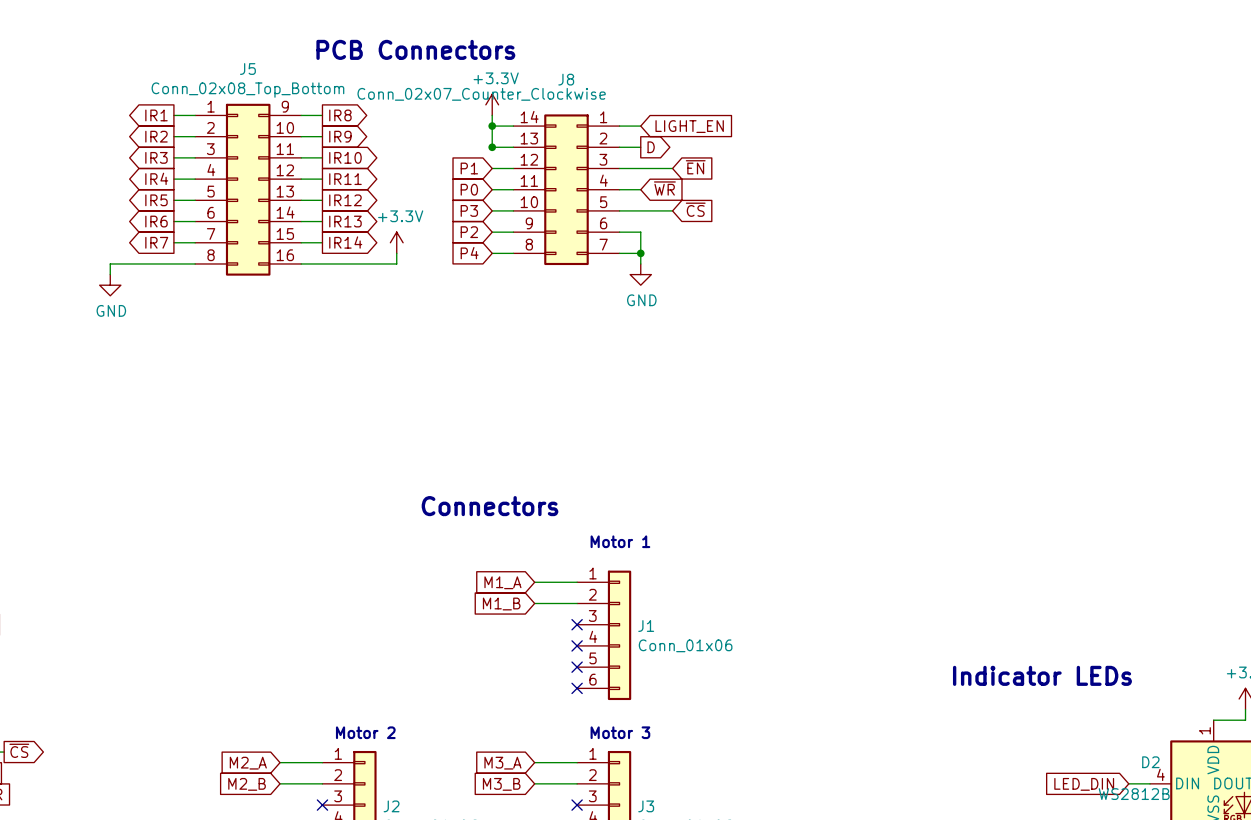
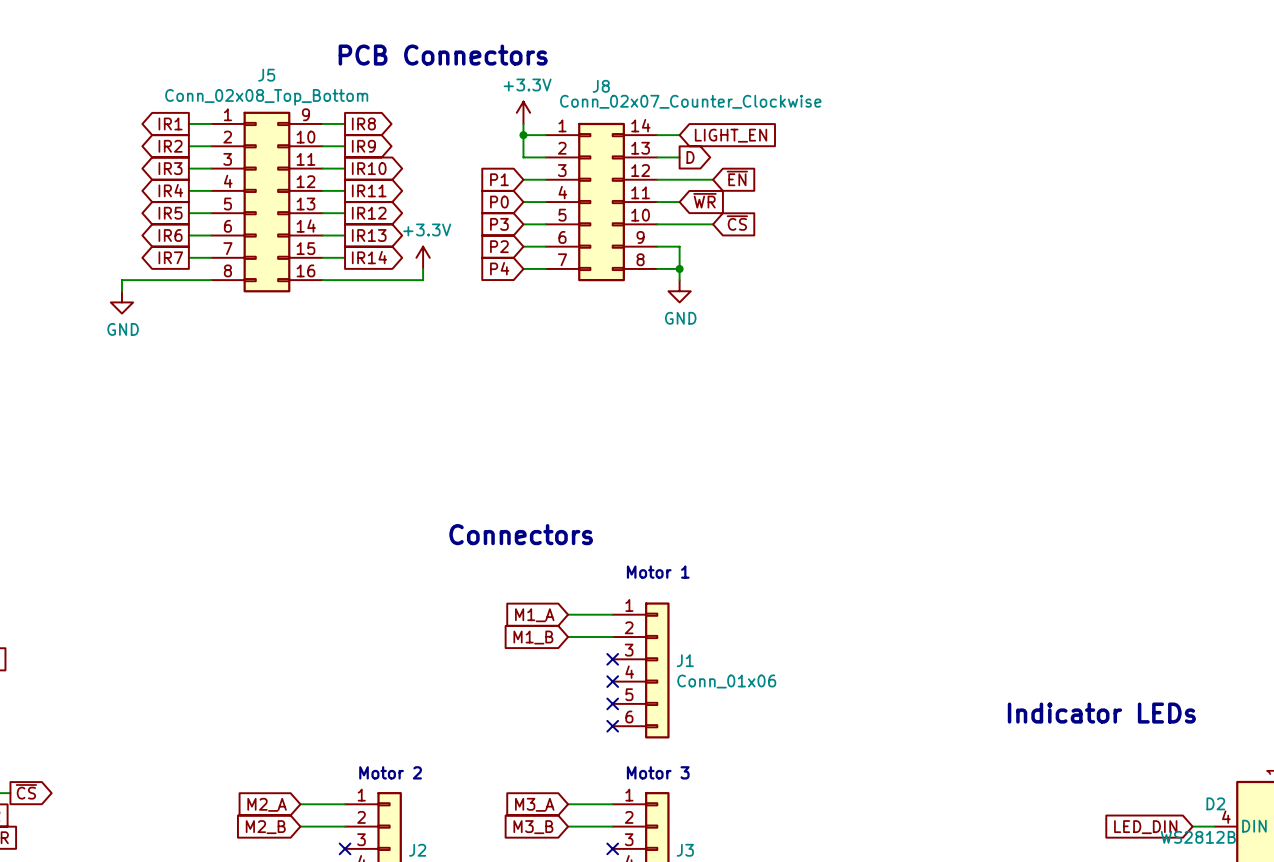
junction: (492, 147) -> none
J8 flip: as is (566, 189) -> left-right (601, 202)

